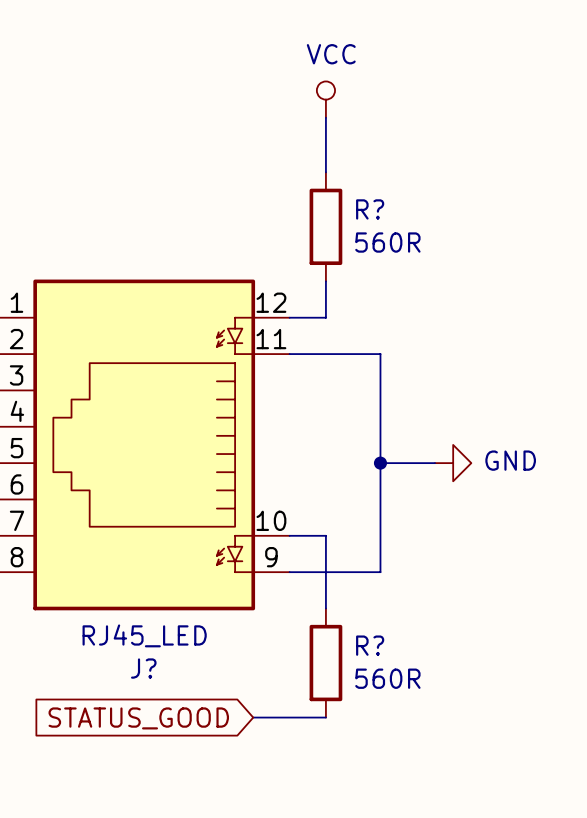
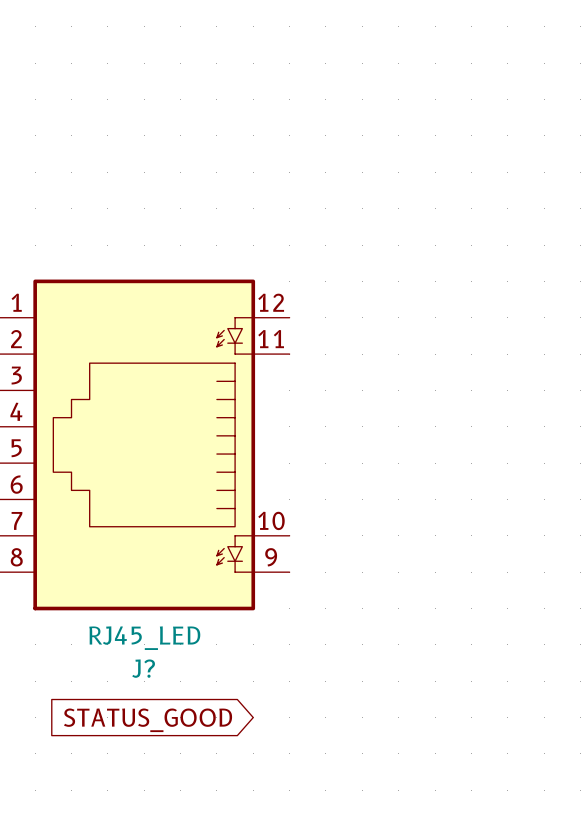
power symbol: VCC (325, 99) -> none
wire: (325, 117) (325, 172) -> none
R?: 560R (325, 226) -> none
wire: (325, 281) (325, 317) (289, 317) -> none
wire: (289, 354) (380, 354) (380, 572) (289, 572) -> none
wire: (380, 463) (435, 463) -> none
junction: (380, 463) -> none
power symbol: GND (453, 463) -> none
wire: (289, 535) (325, 535) (325, 608) -> none
R?: 560R (325, 663) -> none
wire: (253, 717) (325, 717) -> none

